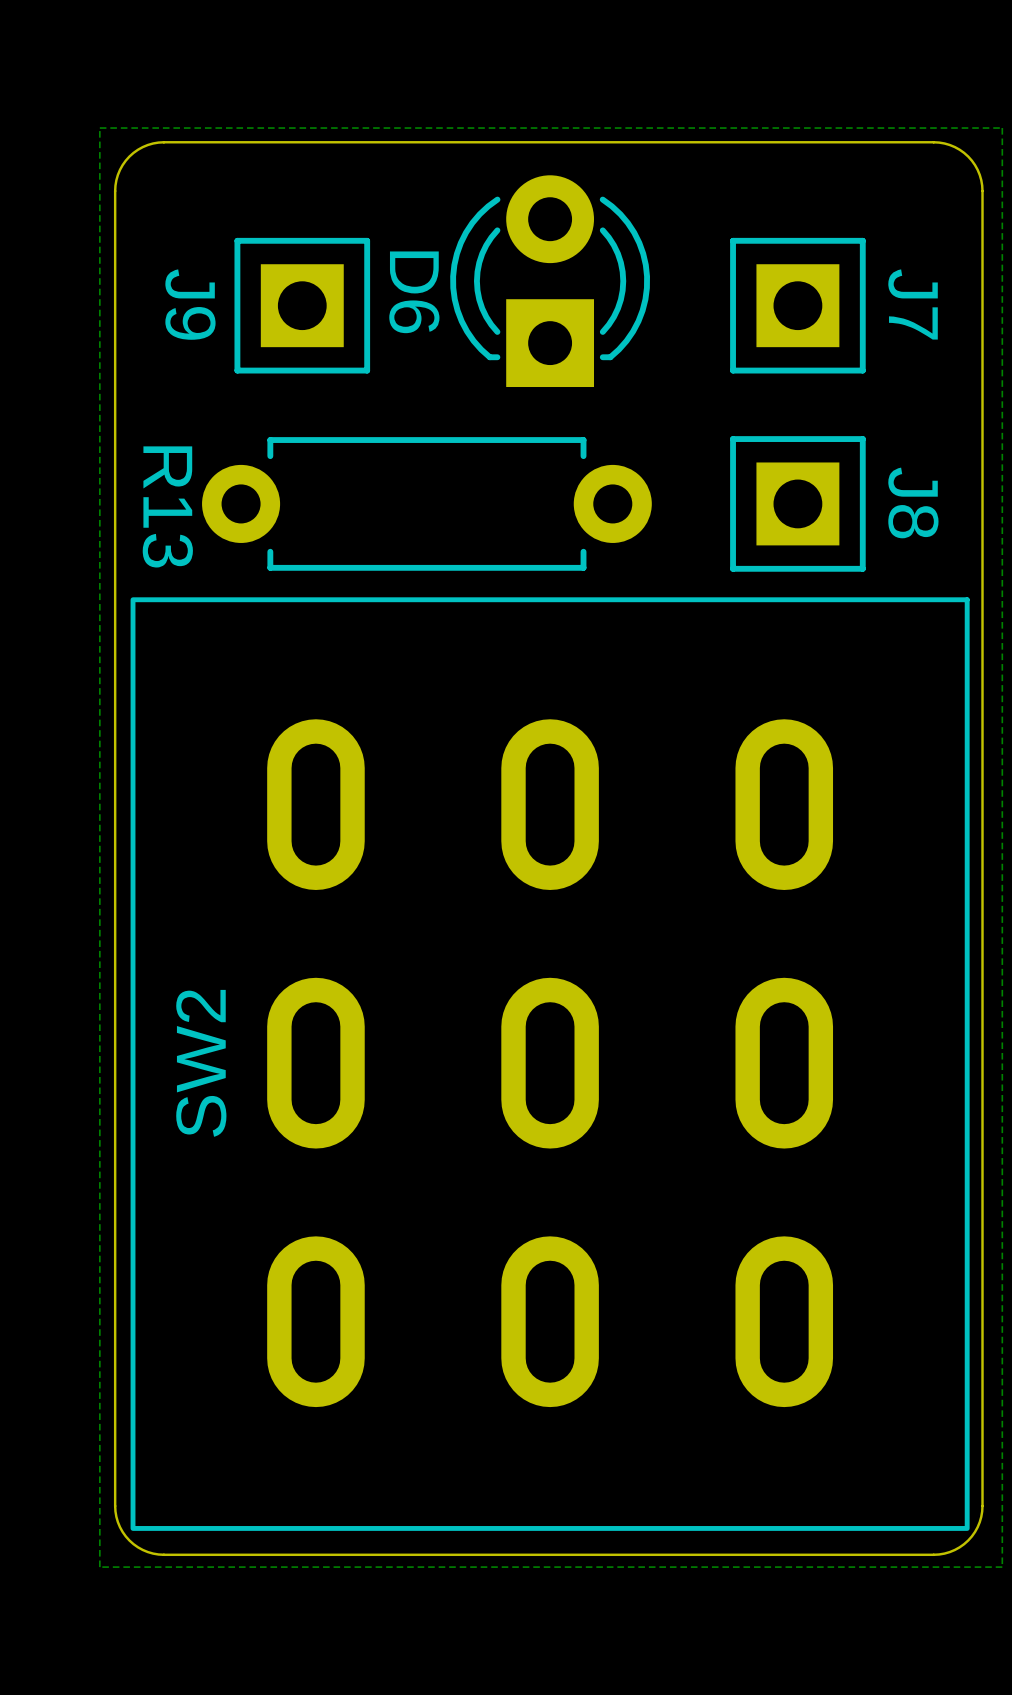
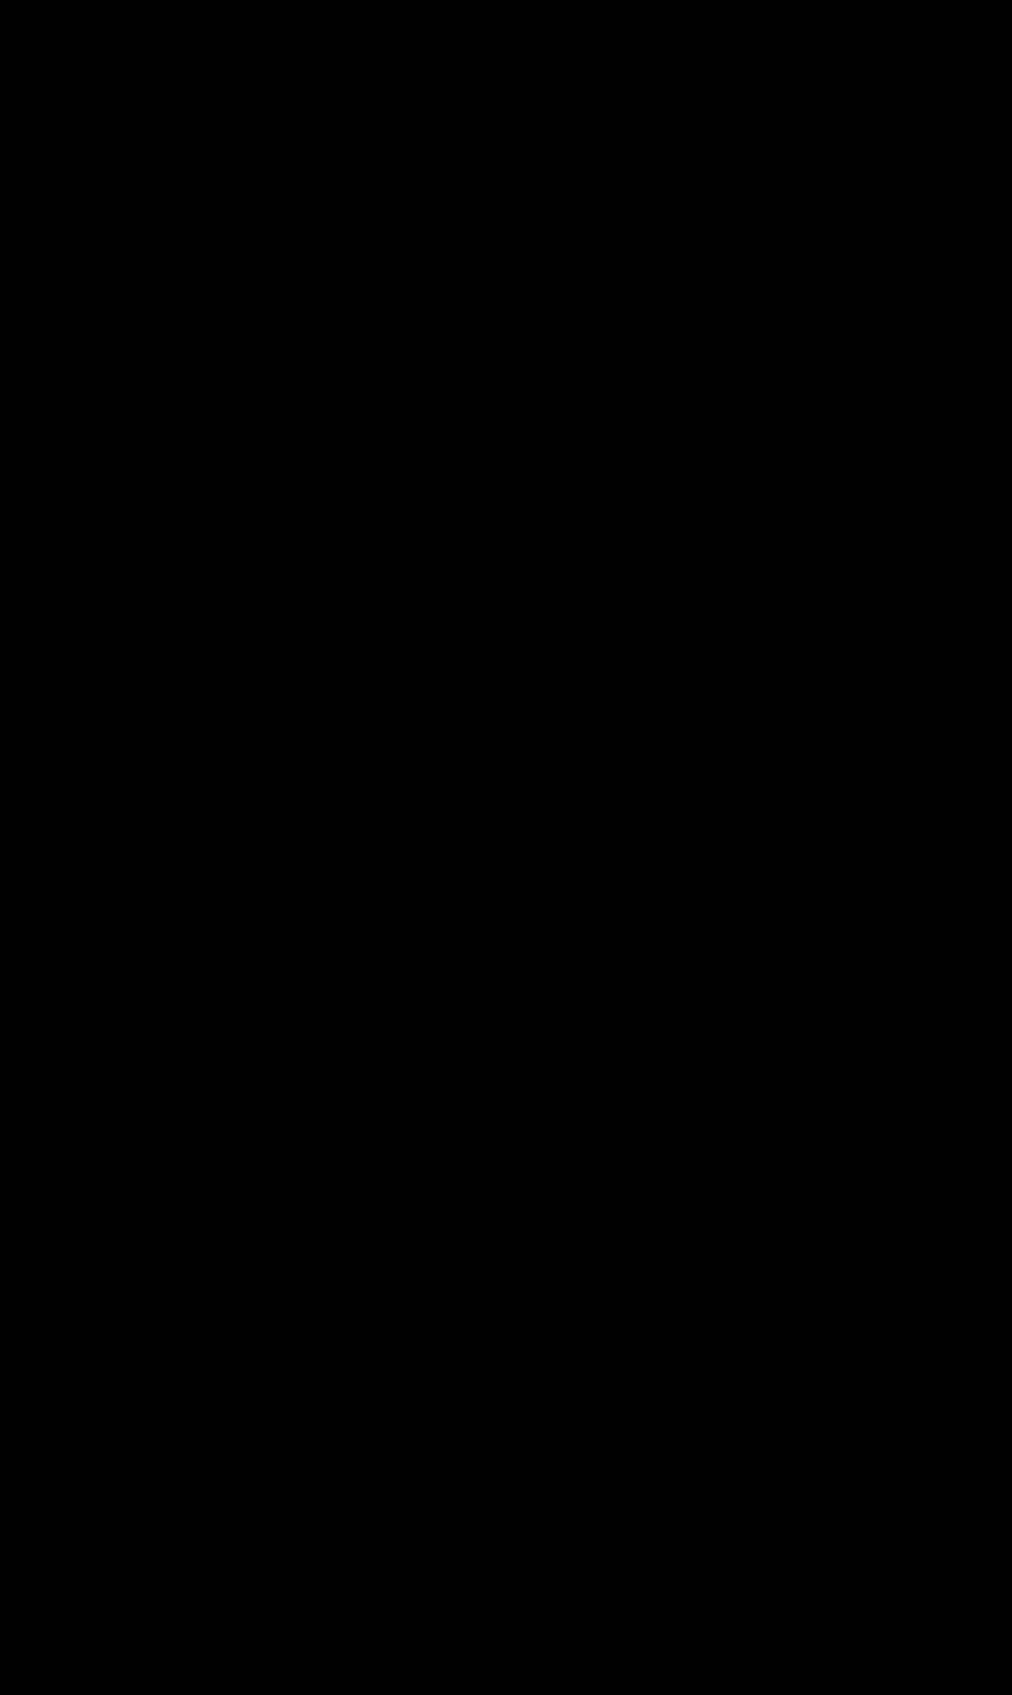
zone outline: (1002, 128) (99, 128) (99, 1567) (1002, 1567) (1002, 128) -> none
board edge: (933, 142) (163, 142) (142, 147) (129, 156) (122, 165) (117, 174) (115, 191) (115, 1506) (119, 1527) (129, 1540) (137, 1547) (153, 1553) (163, 1554) (933, 1554) (954, 1549) (964, 1544) (975, 1531) (981, 1516) (982, 1506) (982, 191) (977, 169) (968, 156) (954, 147) (933, 142) -> none
D6: (550, 281) -> none
J9: (302, 305) -> none
J7: (797, 305) -> none
R13: (426, 503) -> none
J8: (797, 503) -> none
SW2: (550, 1064) -> none

